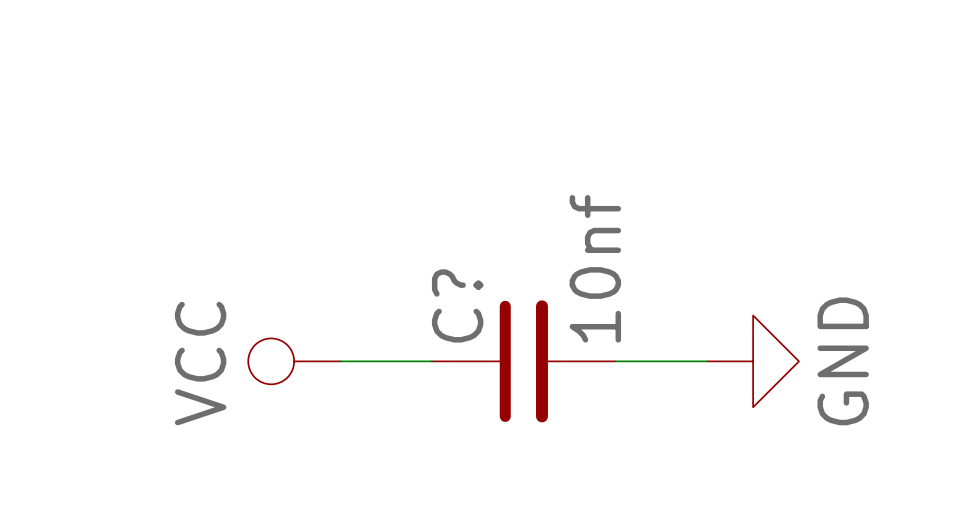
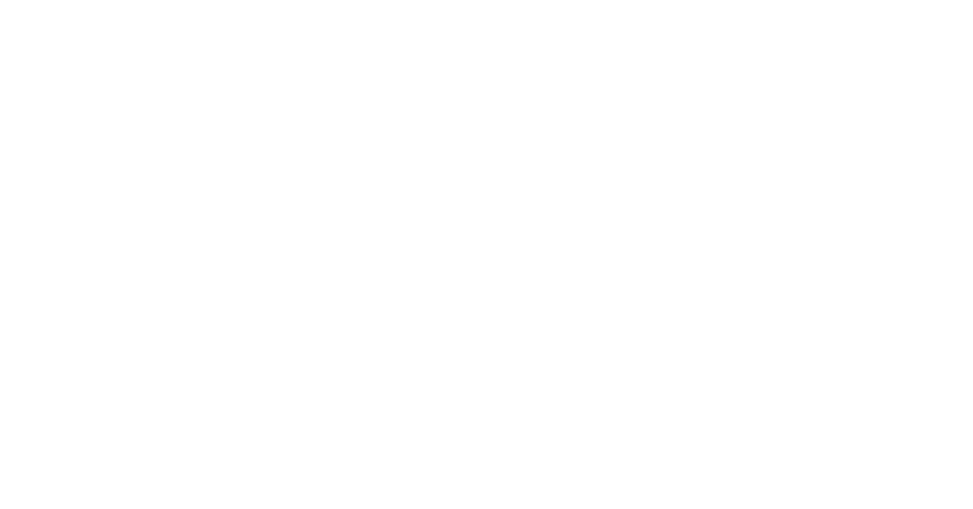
power symbol: VCC (294, 361) -> none
wire: (340, 361) (431, 361) -> none
C?: 10nf (523, 361) -> none
wire: (615, 361) (707, 361) -> none
power symbol: GND (753, 361) -> none

